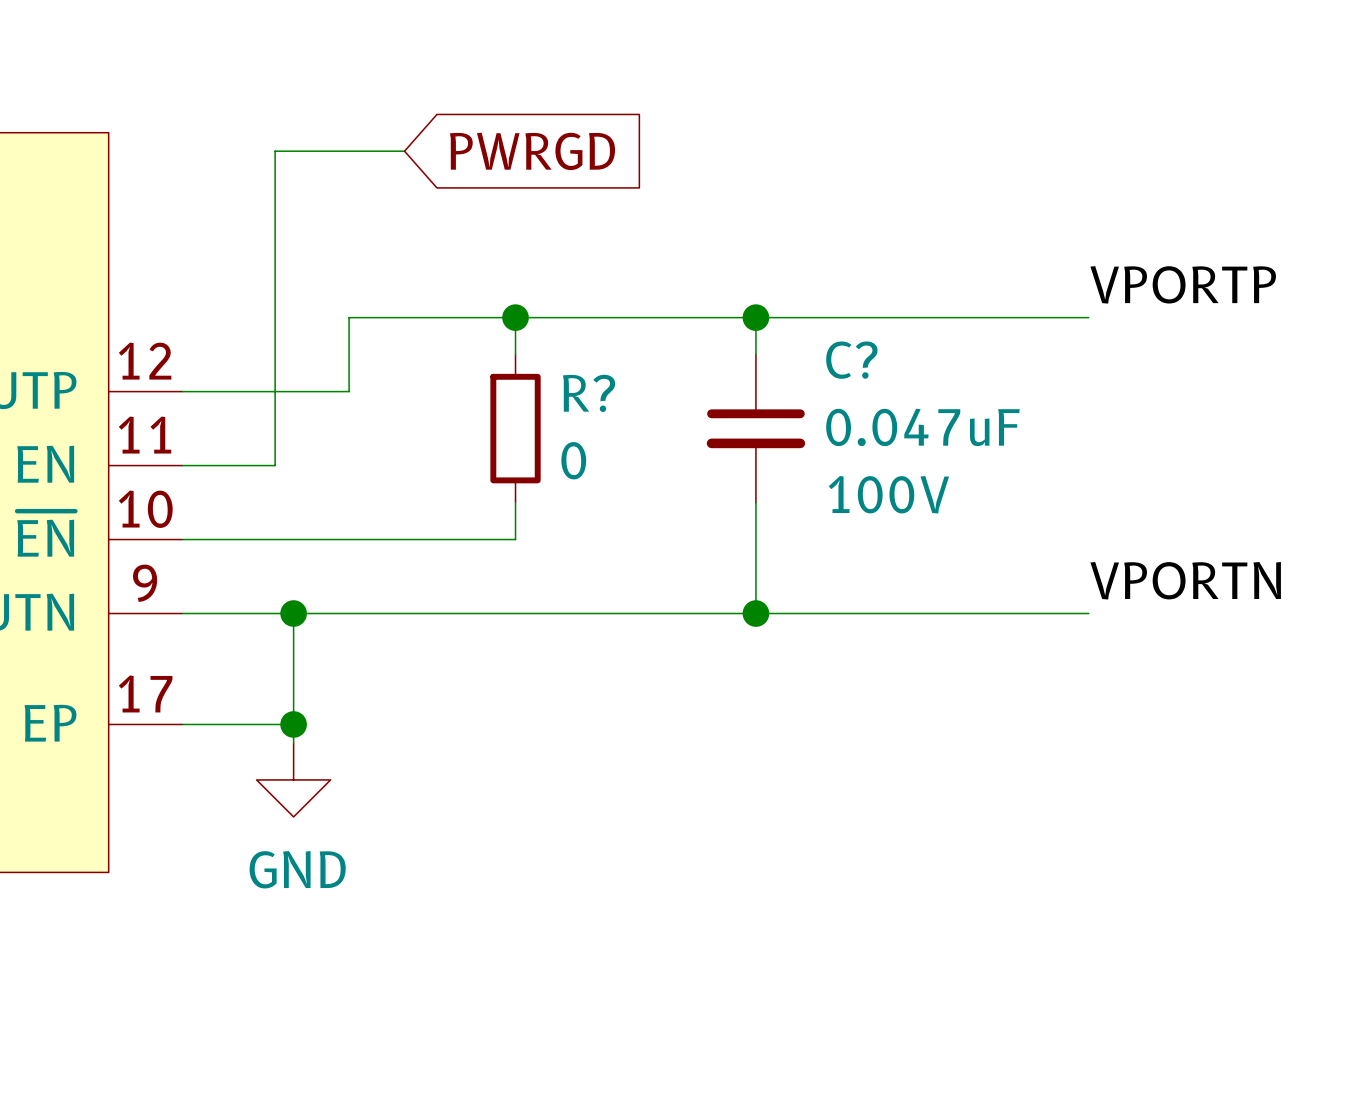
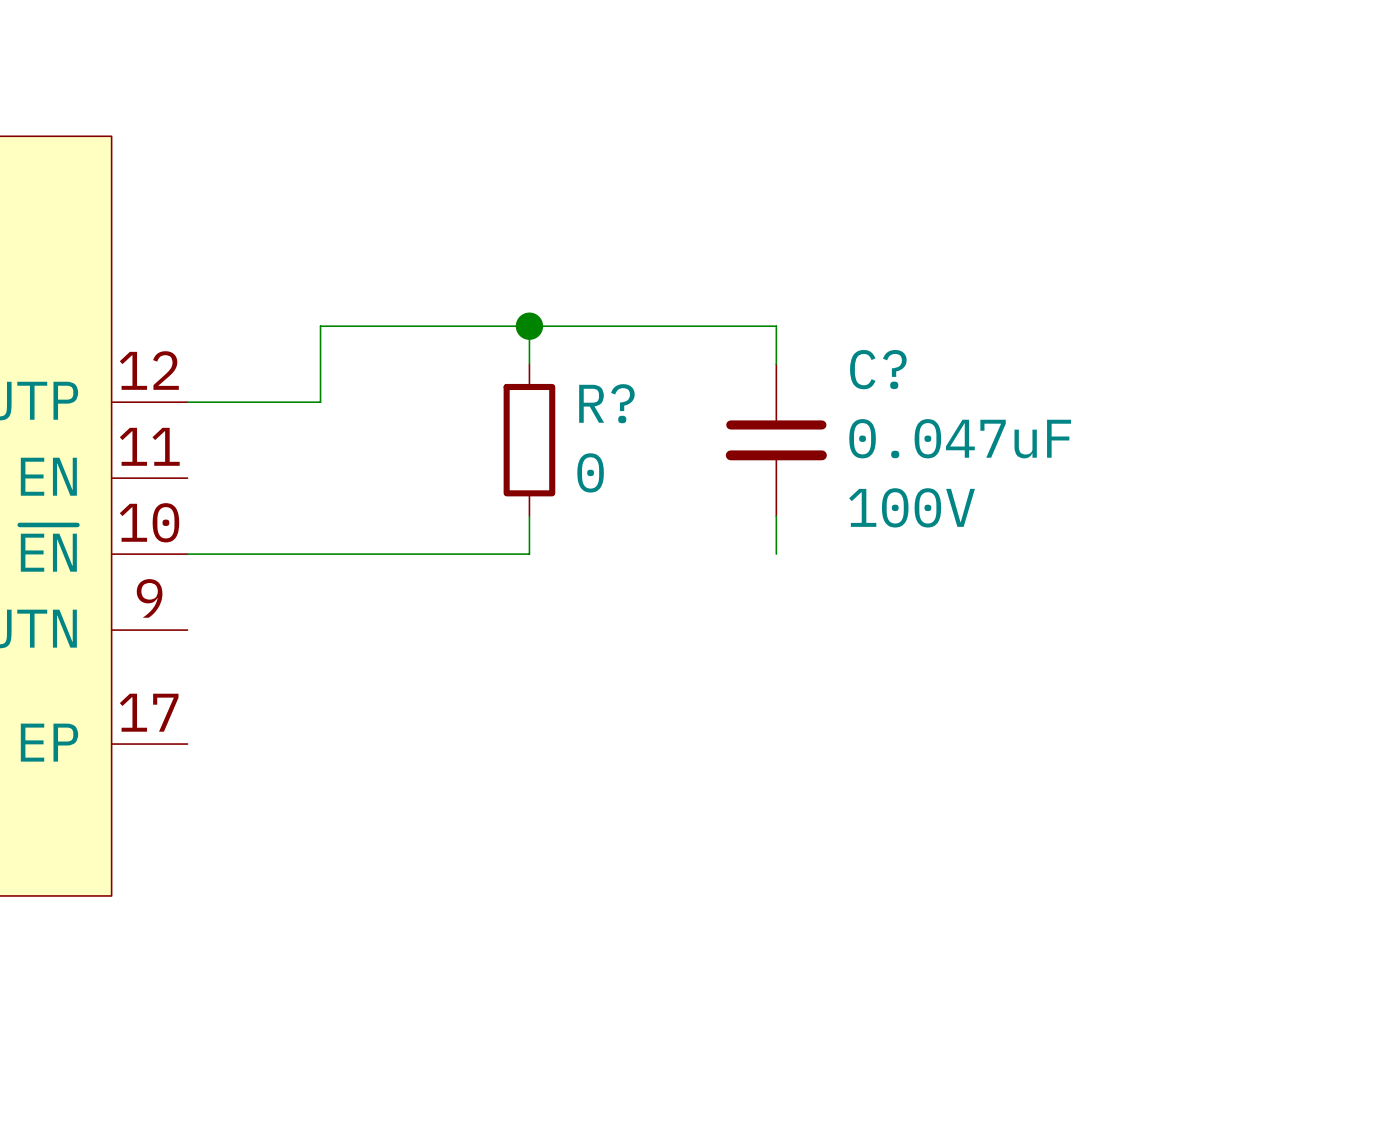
wire: (404, 151) (275, 151) (275, 465) (182, 465) -> none
global label: PWRGD (532, 151) -> none
label: VPORTP (1183, 284) -> none
wire: (349, 317) (349, 391) (312, 391) -> (358, 326) (320, 326) (320, 402)
wire: (755, 317) (1088, 317) -> none
junction: (755, 317) -> none
wire: (755, 539) (755, 613) -> none
label: VPORTN (1185, 580) -> none
wire: (182, 613) (1088, 613) -> none
wire: (293, 613) (293, 742) -> none
junction: (293, 613) -> none
junction: (755, 613) -> none
wire: (182, 724) (293, 724) -> none
junction: (293, 724) -> none
power symbol: GND (293, 779) -> none

